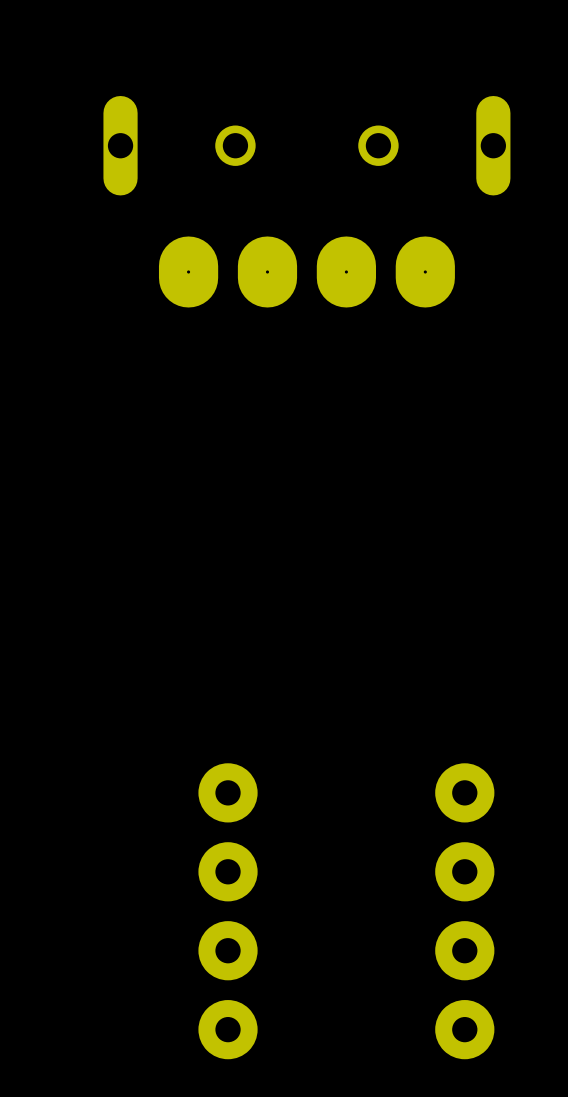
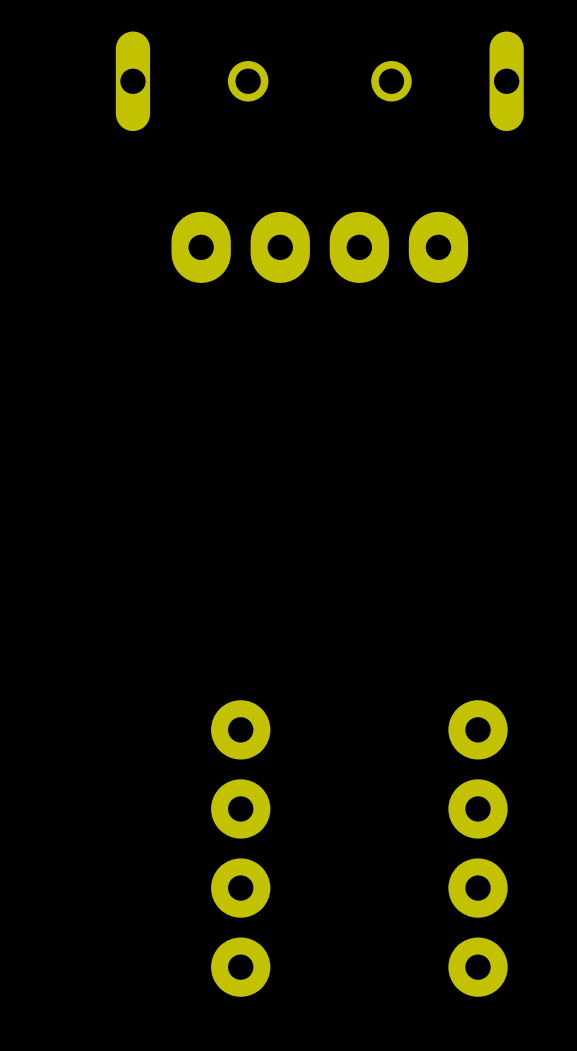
part: (306, 271) -> none
part: none -> (319, 247)

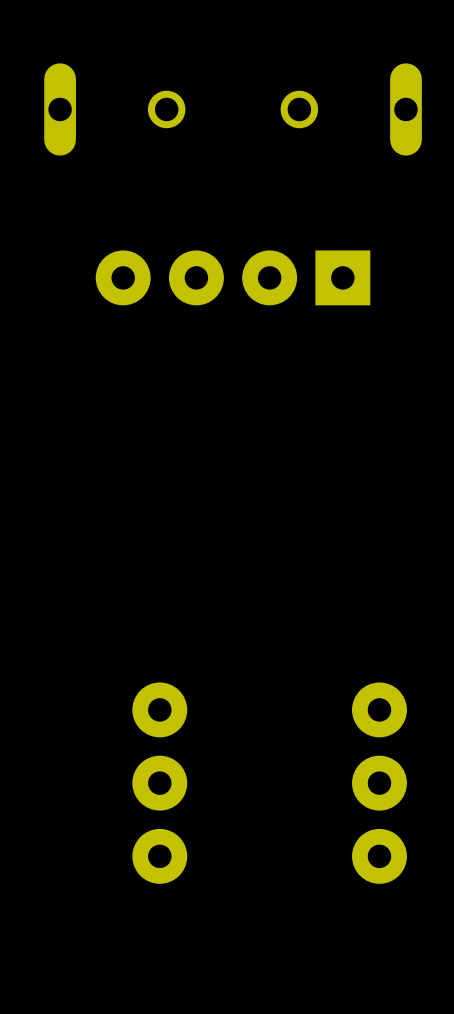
part footprint: [171, 211, 469, 283] -> [95, 250, 371, 306]
part: (240, 967) -> none
part: (478, 967) -> none

